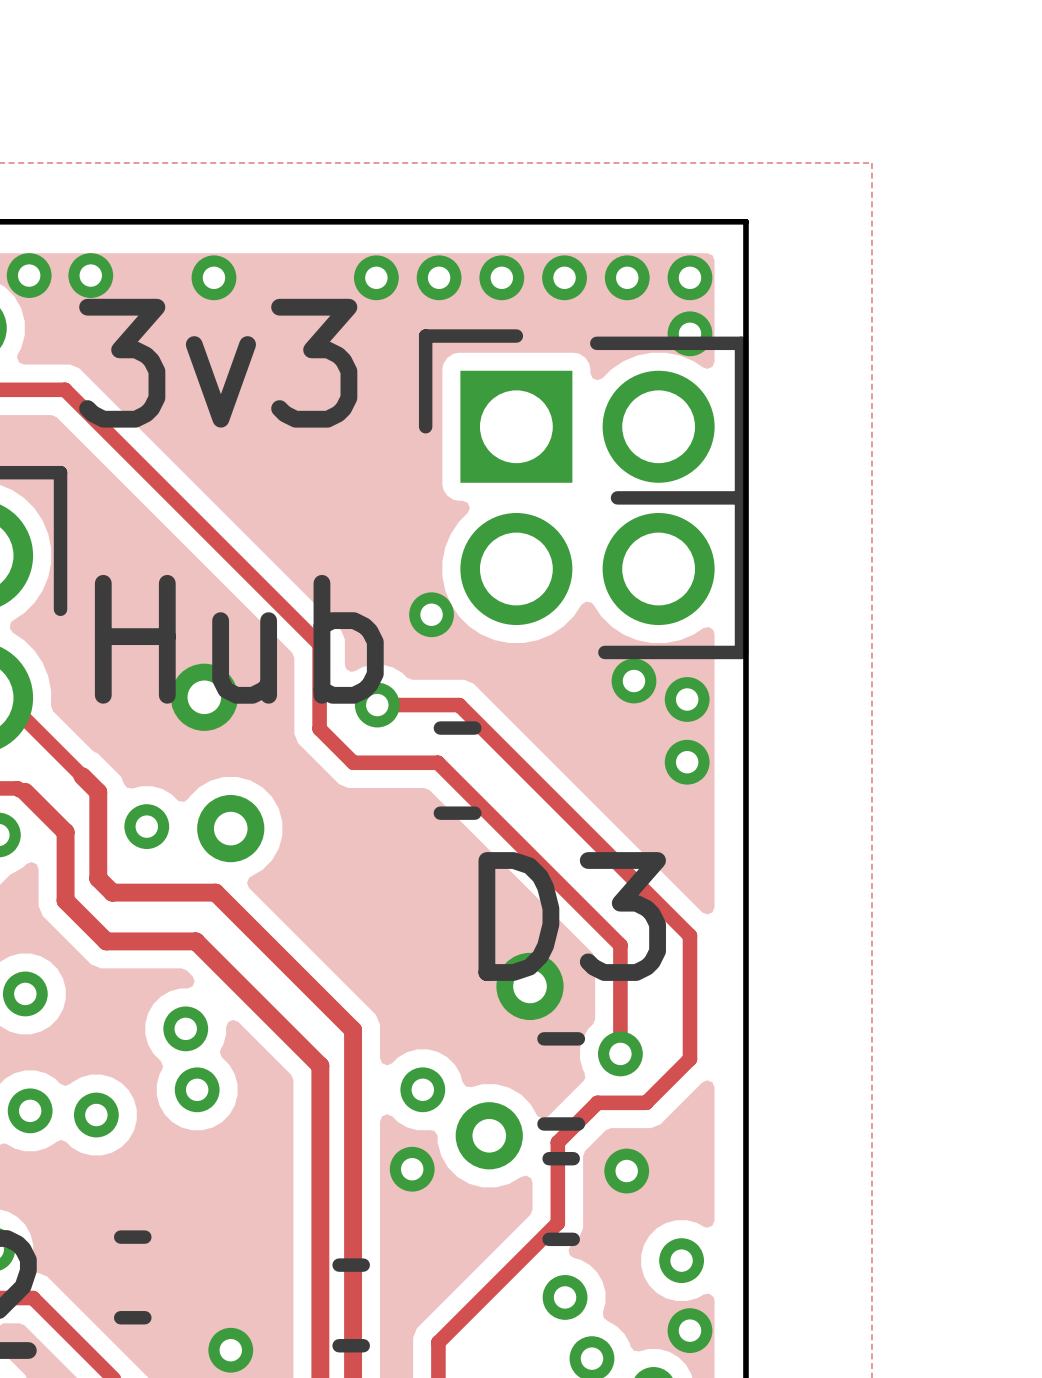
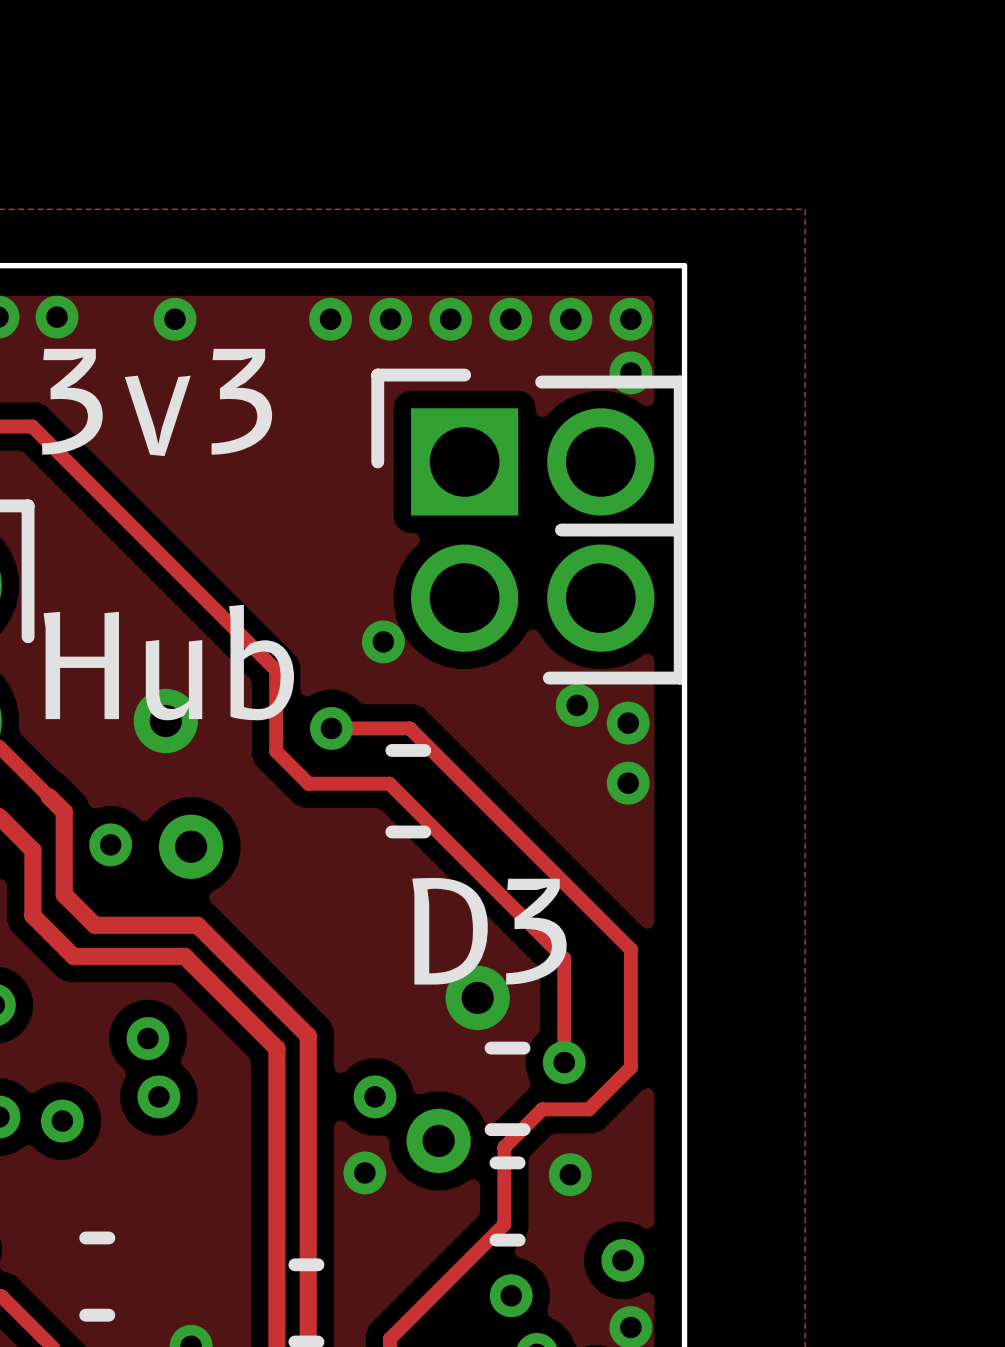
track: (112, 892) (215, 892) (353, 1030) -> (77, 908) (94, 925) (197, 925) (308, 1035) (308, 1039)
track: (106, 941) (195, 941) (320, 1065) -> (71, 954) (73, 956) (184, 956) (276, 1048) (276, 1074)

